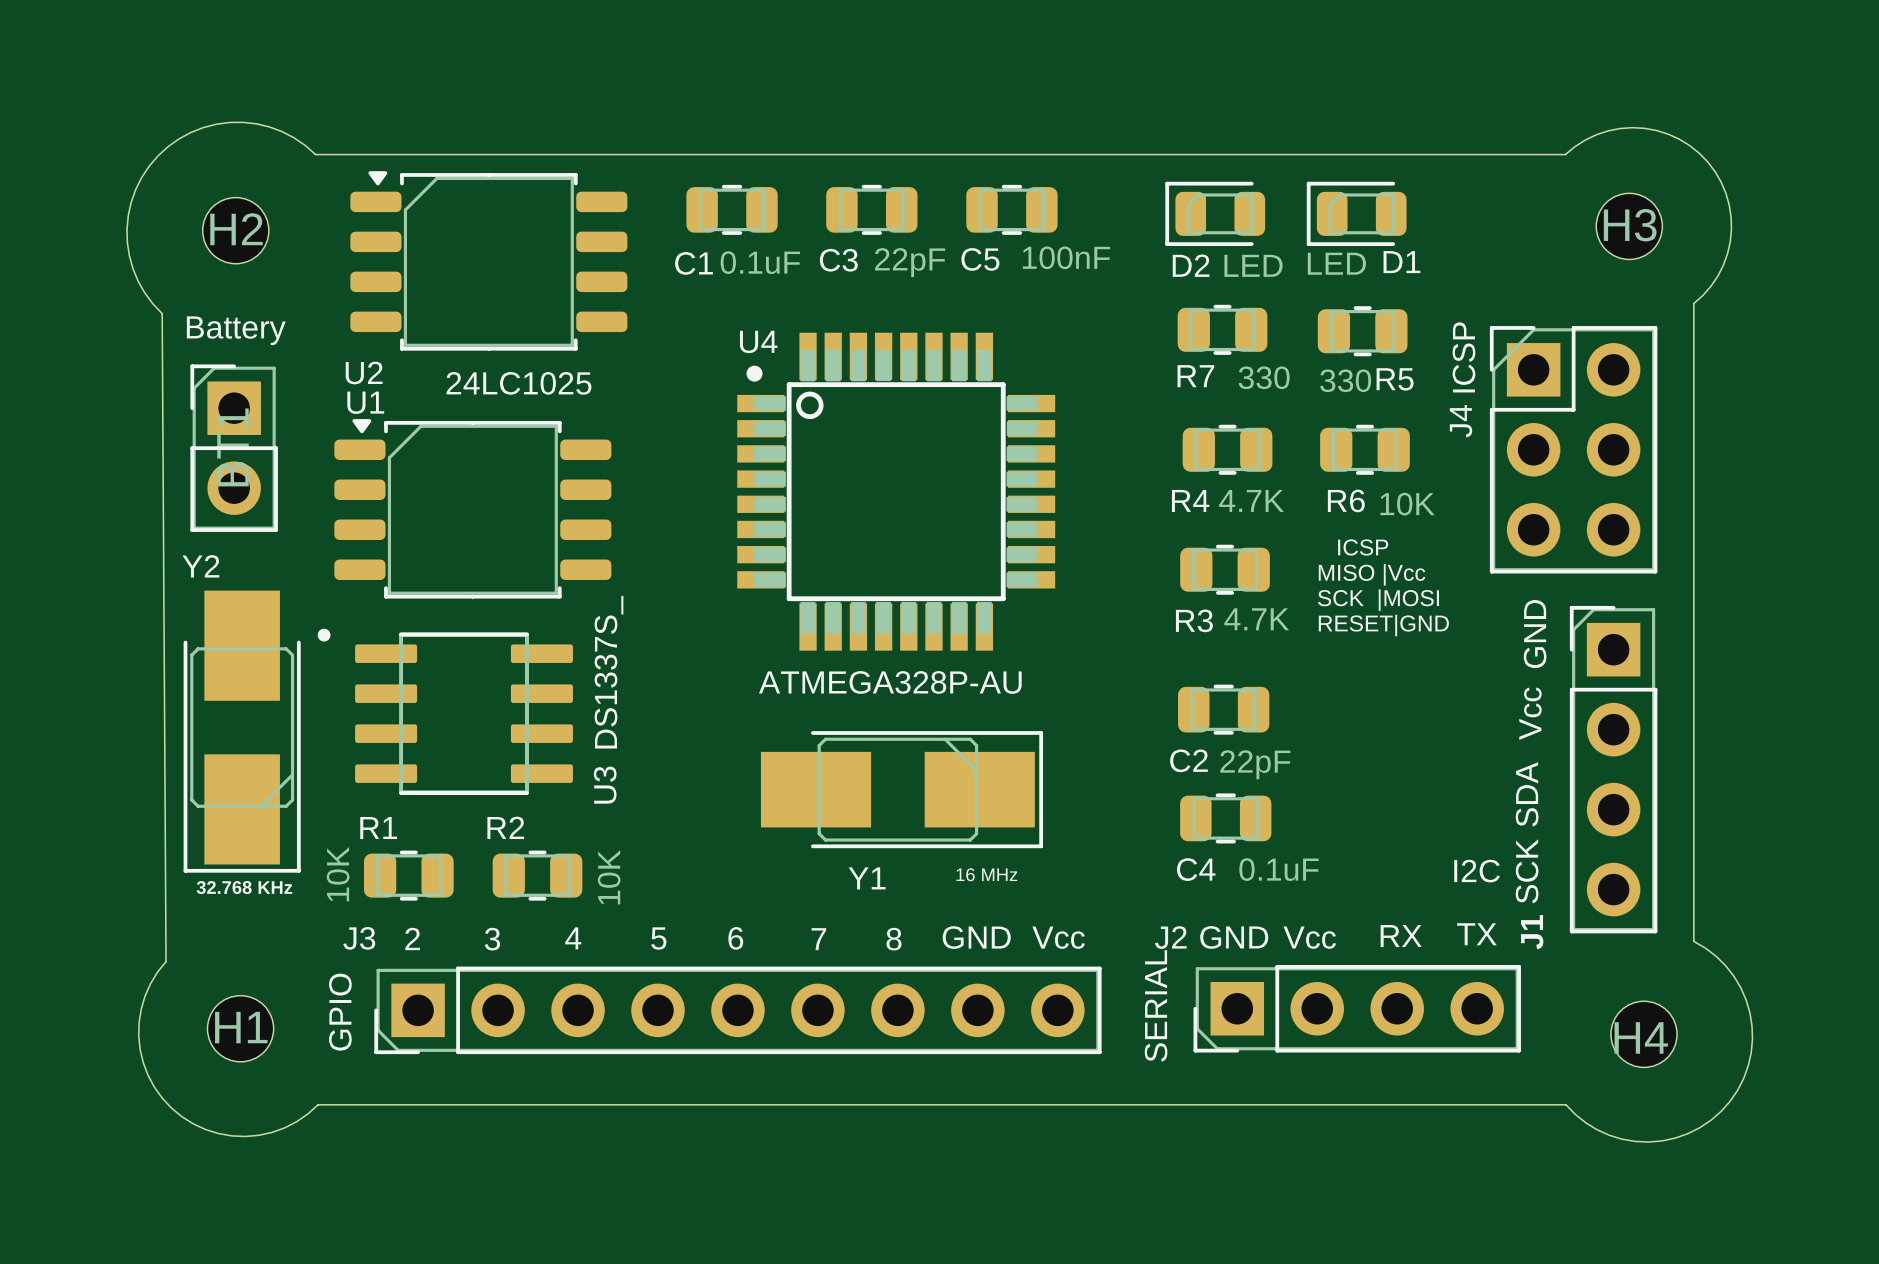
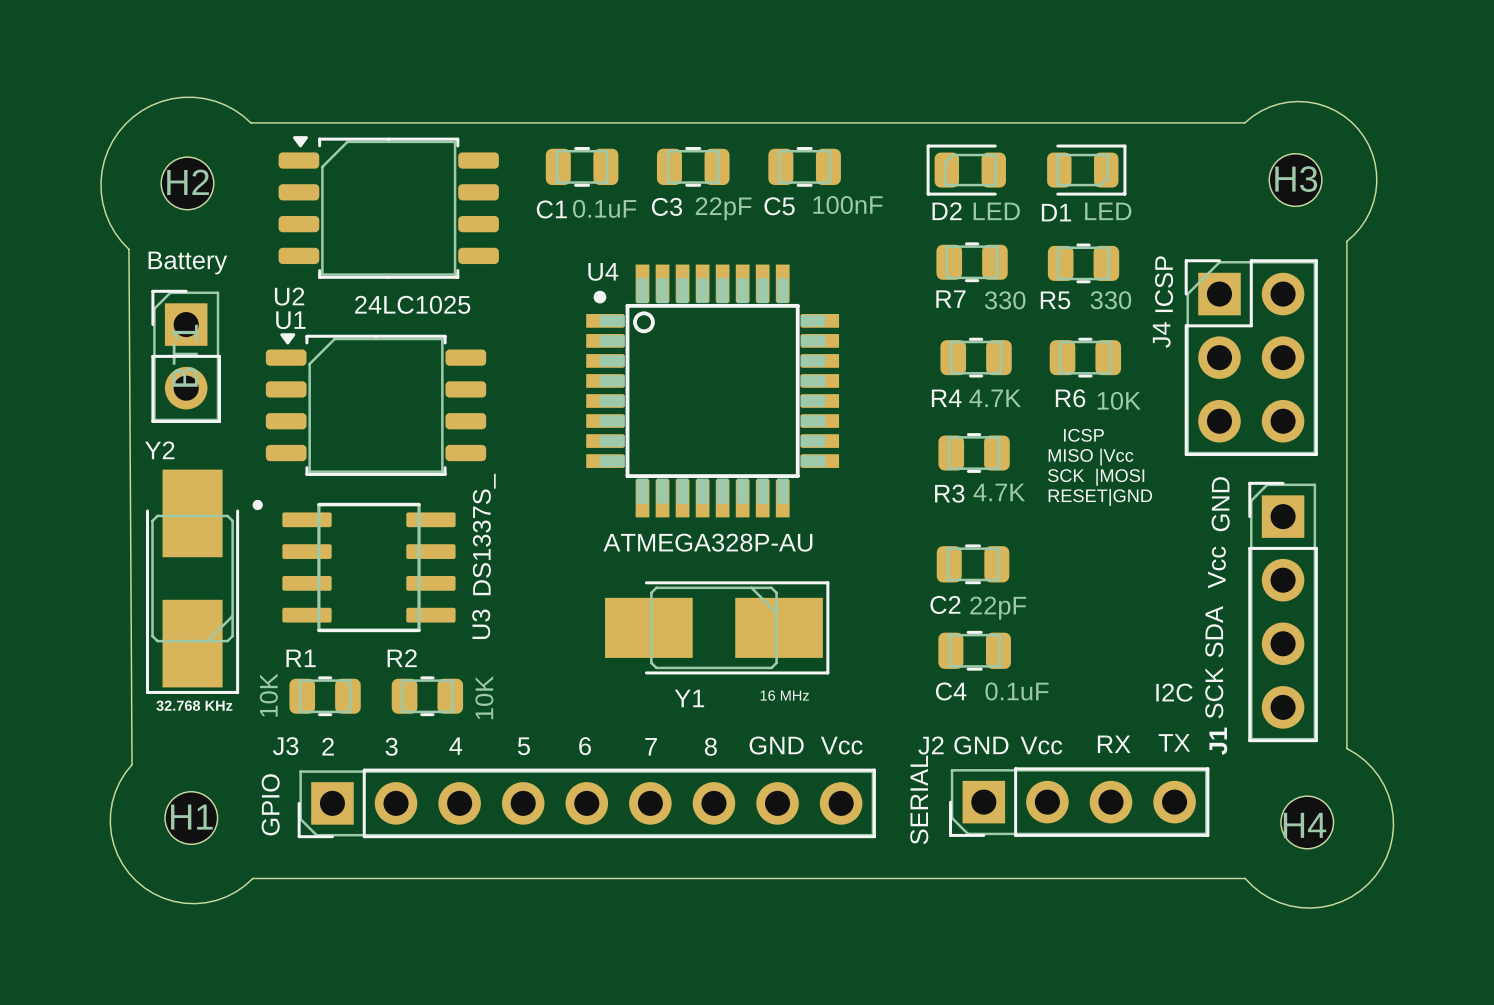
D1 rotation: 0° (1356, 213) -> 180° (1086, 170)
D1 name position: D1 (1401, 262) -> D1 (1056, 212)
R5 name position: R5 (1395, 379) -> R5 (1055, 300)
R5 value position: 330 (1345, 380) -> 330 (1110, 300)

